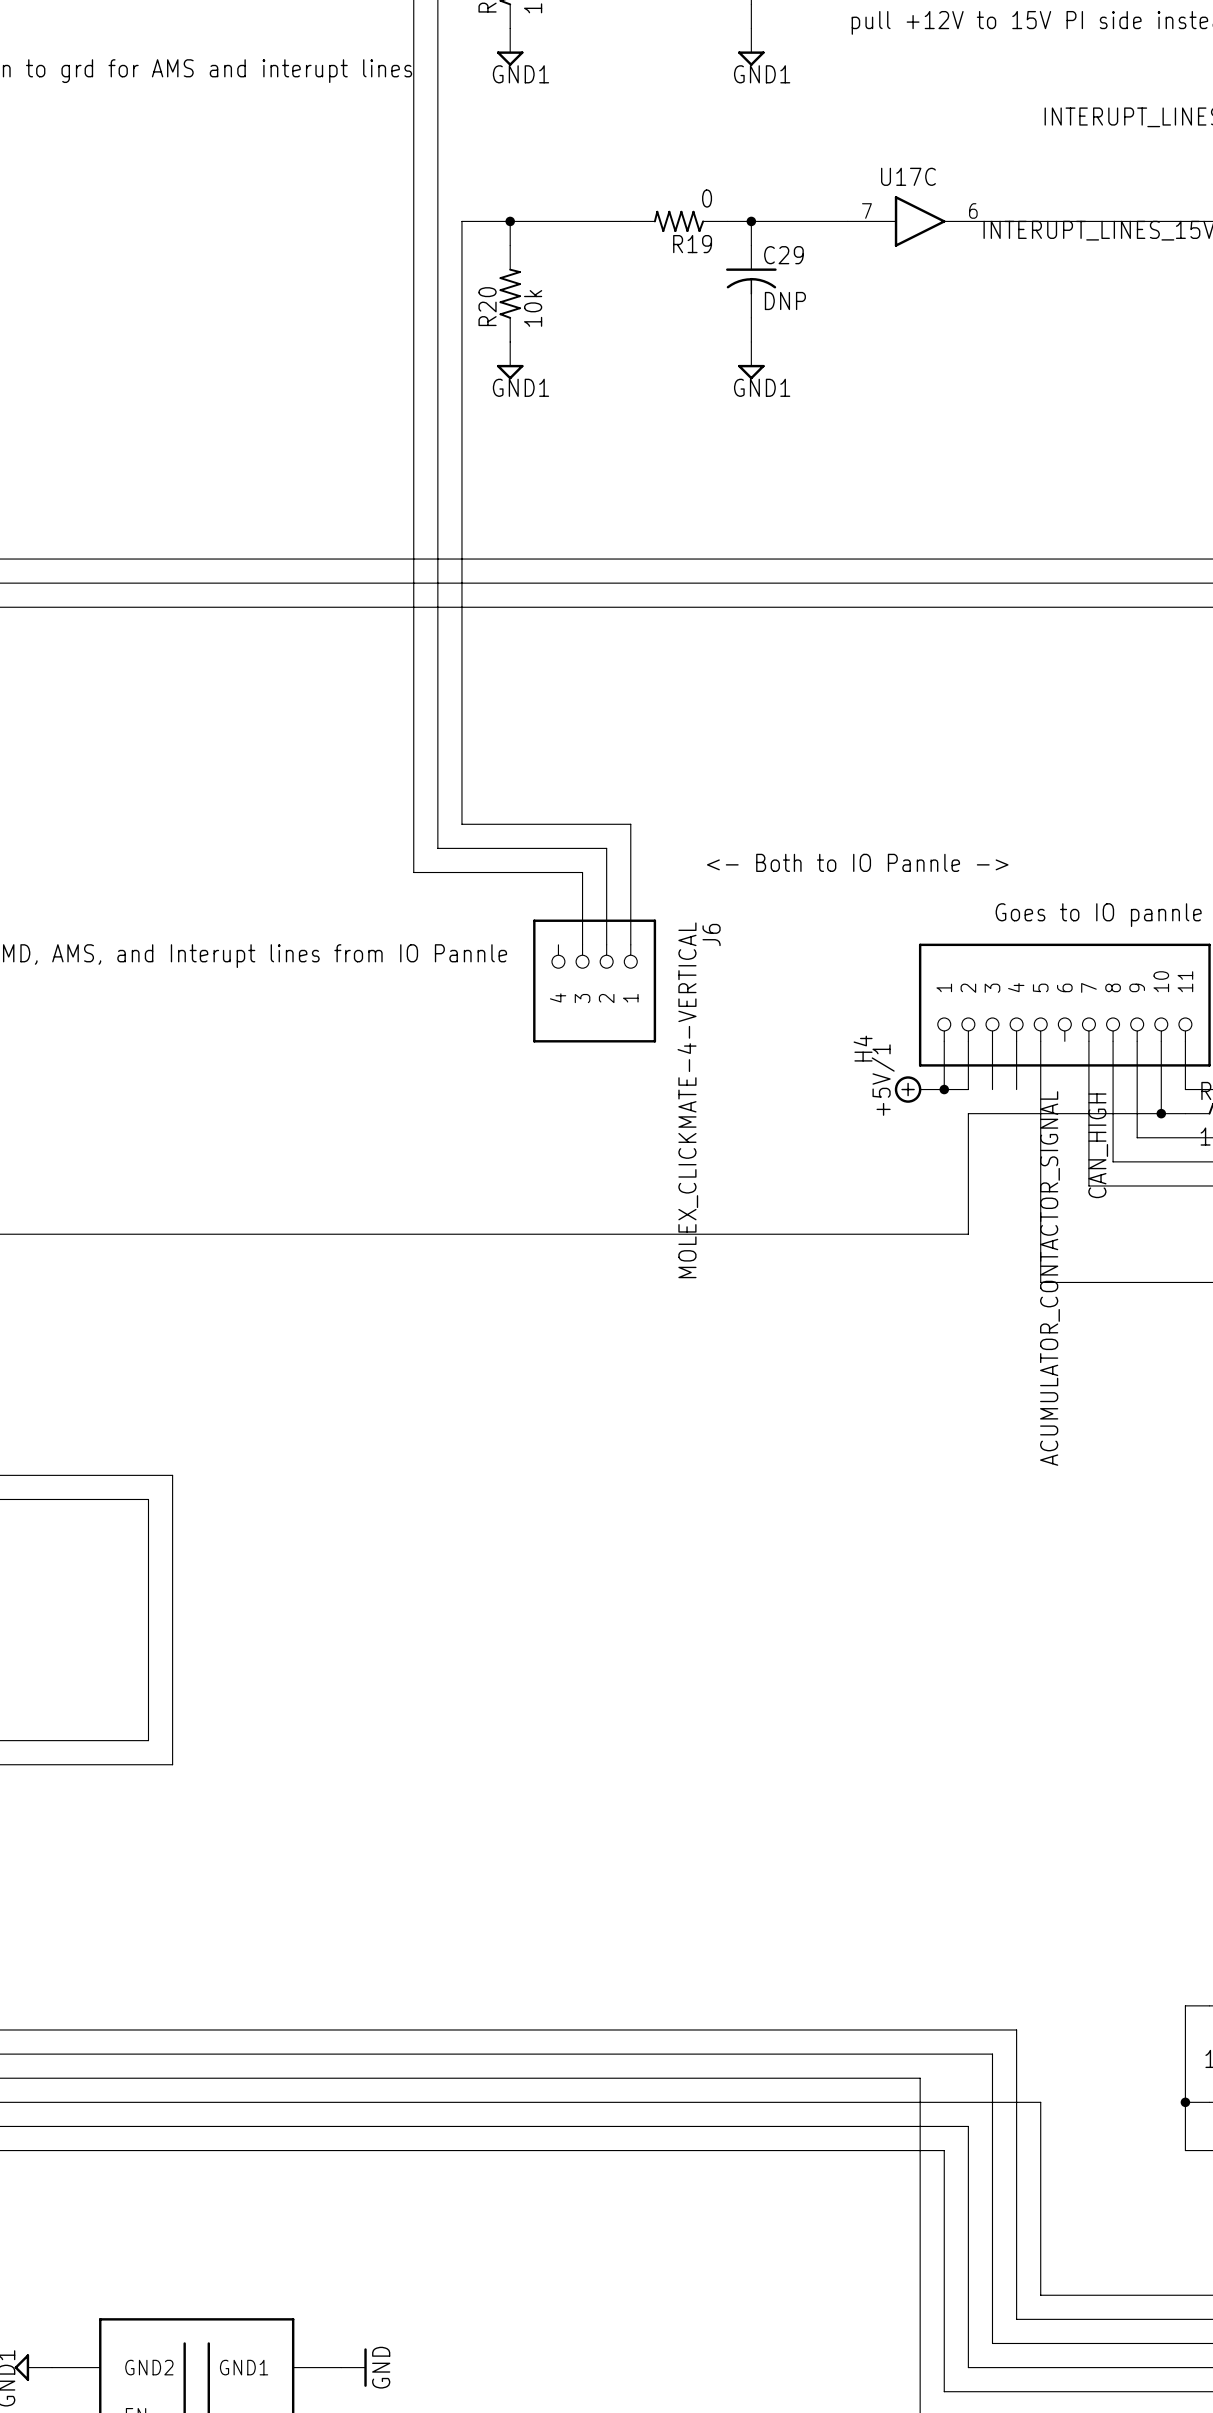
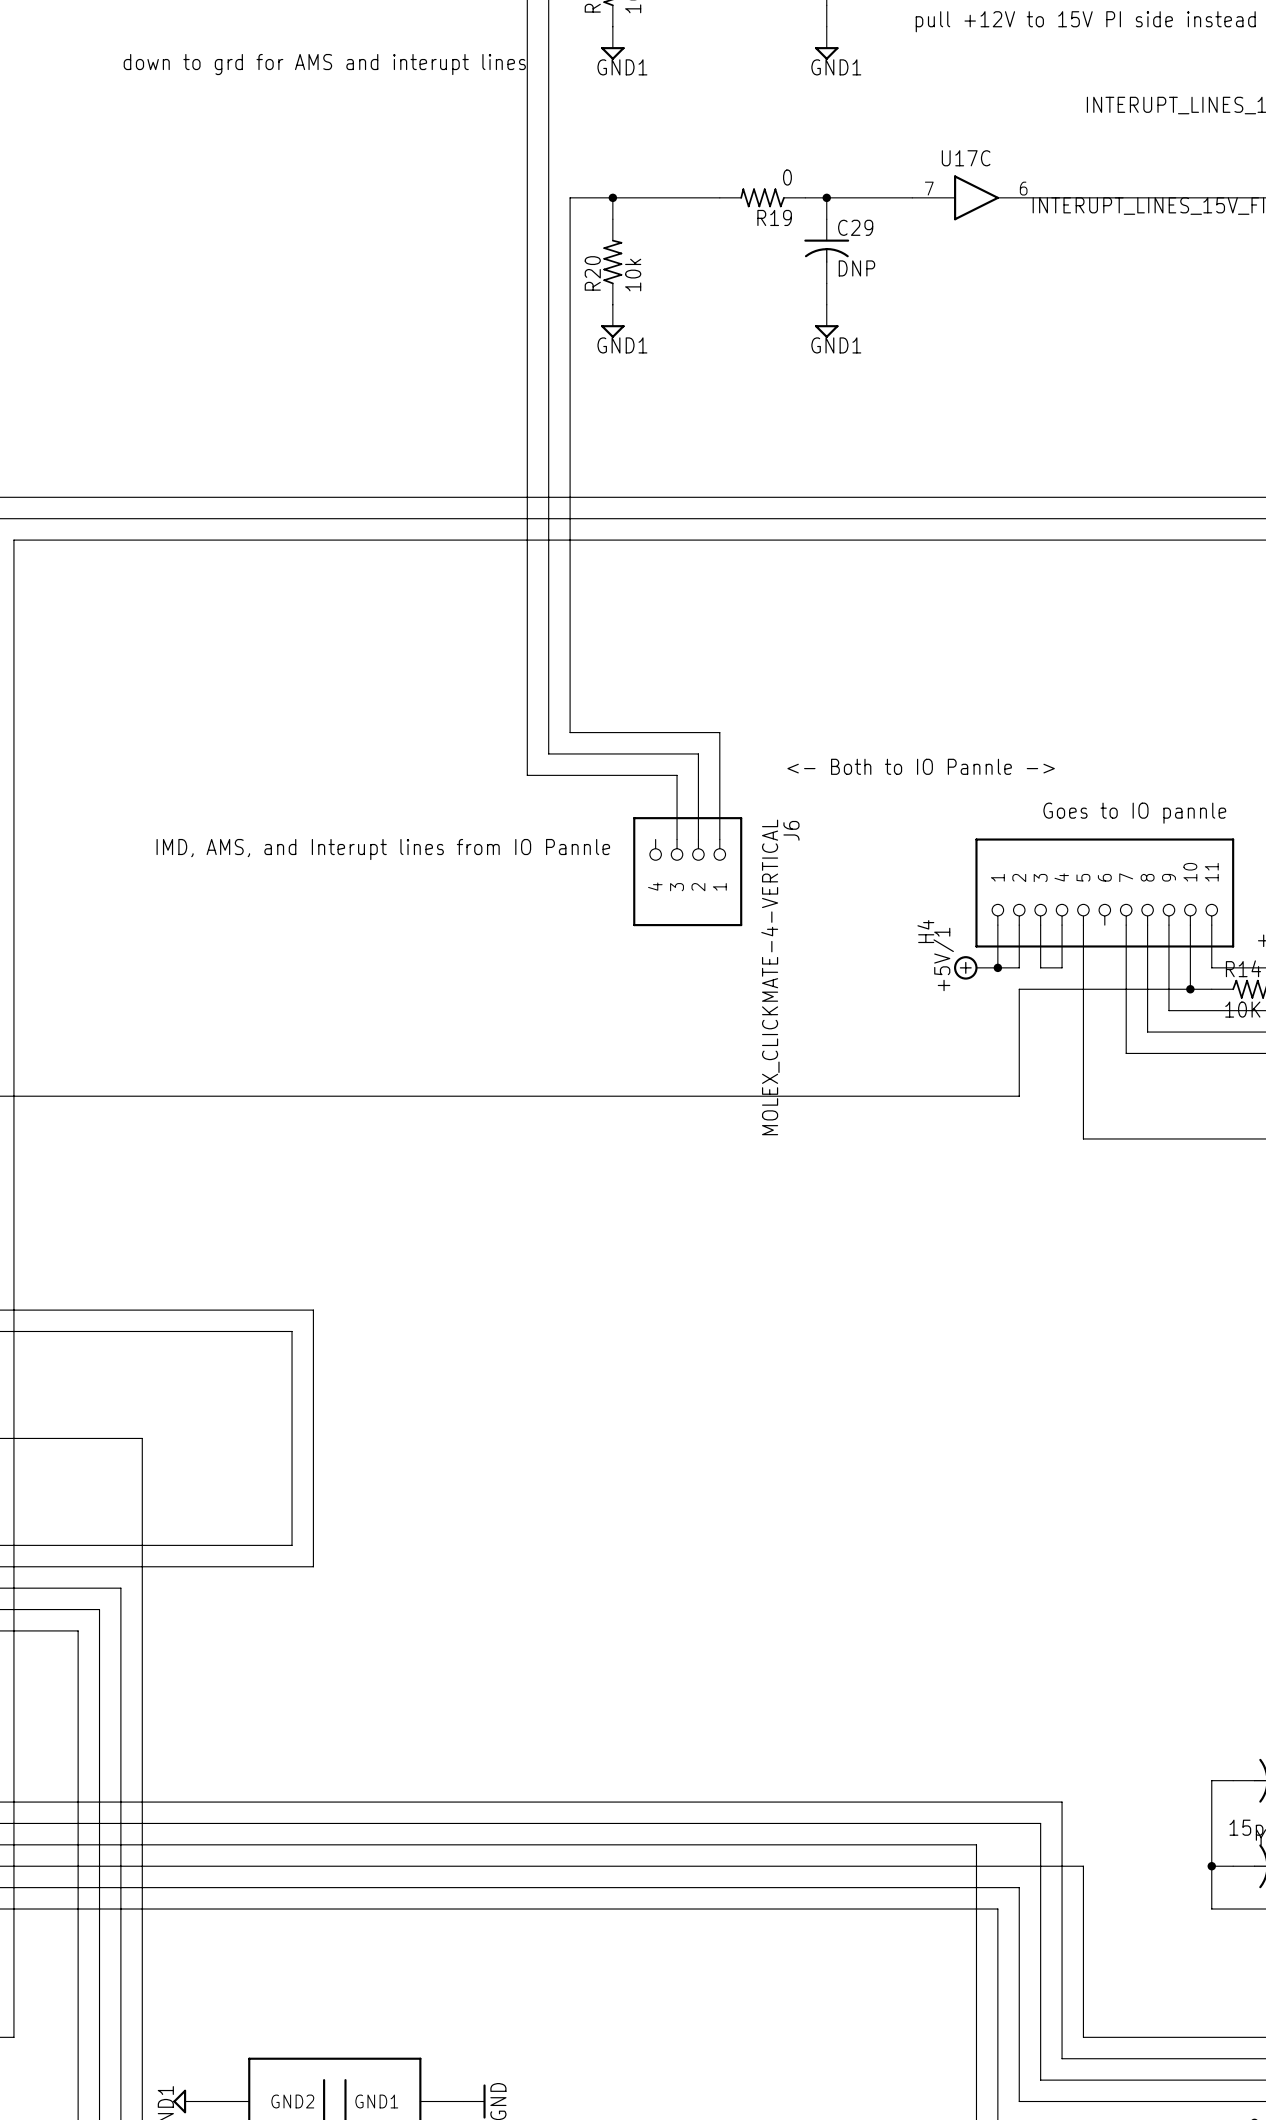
wire: none -> (1040, 967) (1062, 967)
label: CAN_HIGH (1098, 1145) -> none
label: ACUMULATOR_CONTACTOR_SIGNAL (1049, 1278) -> none

